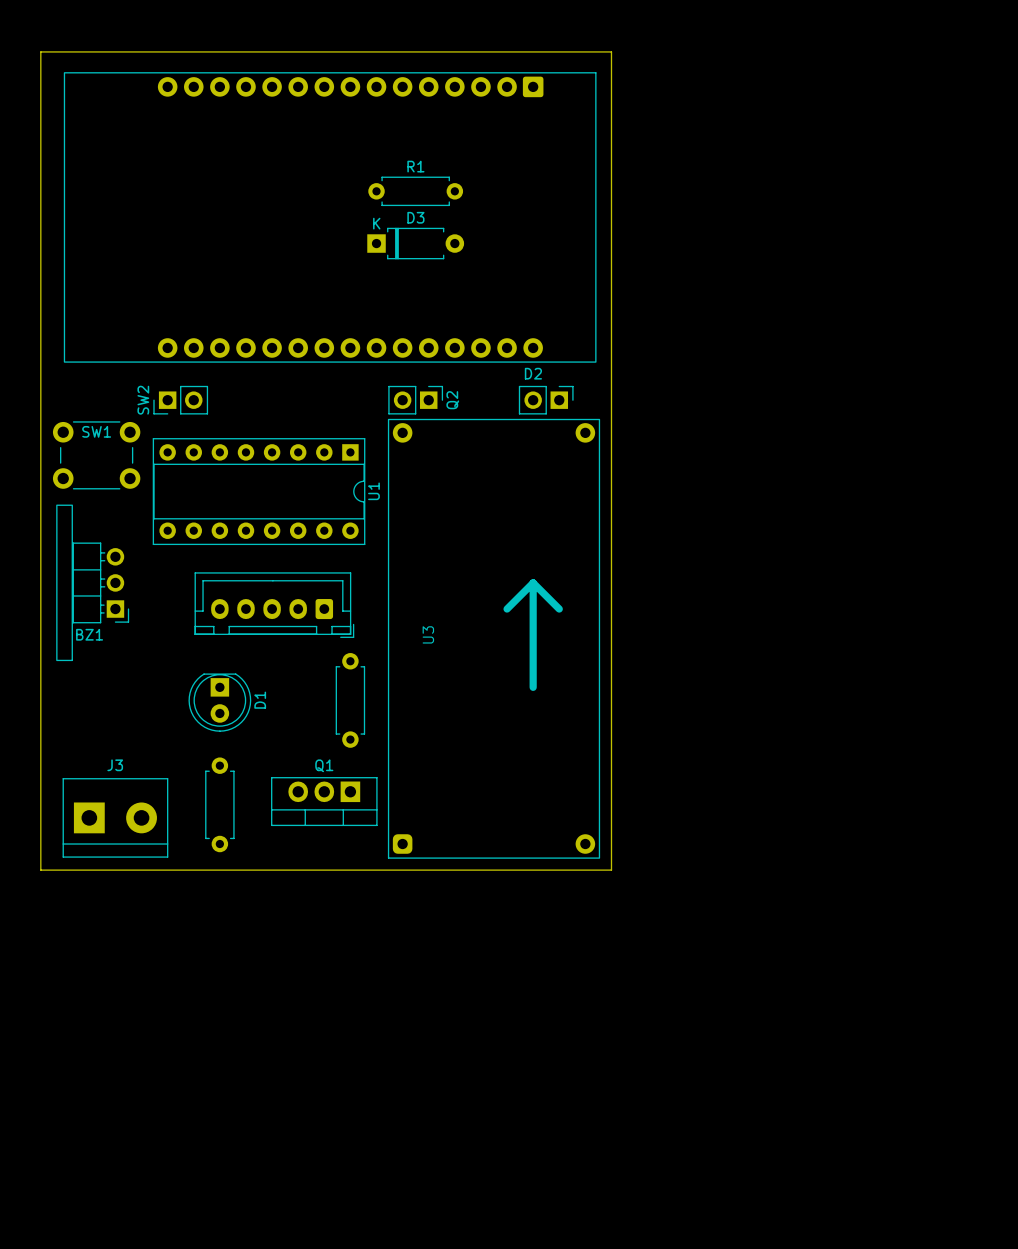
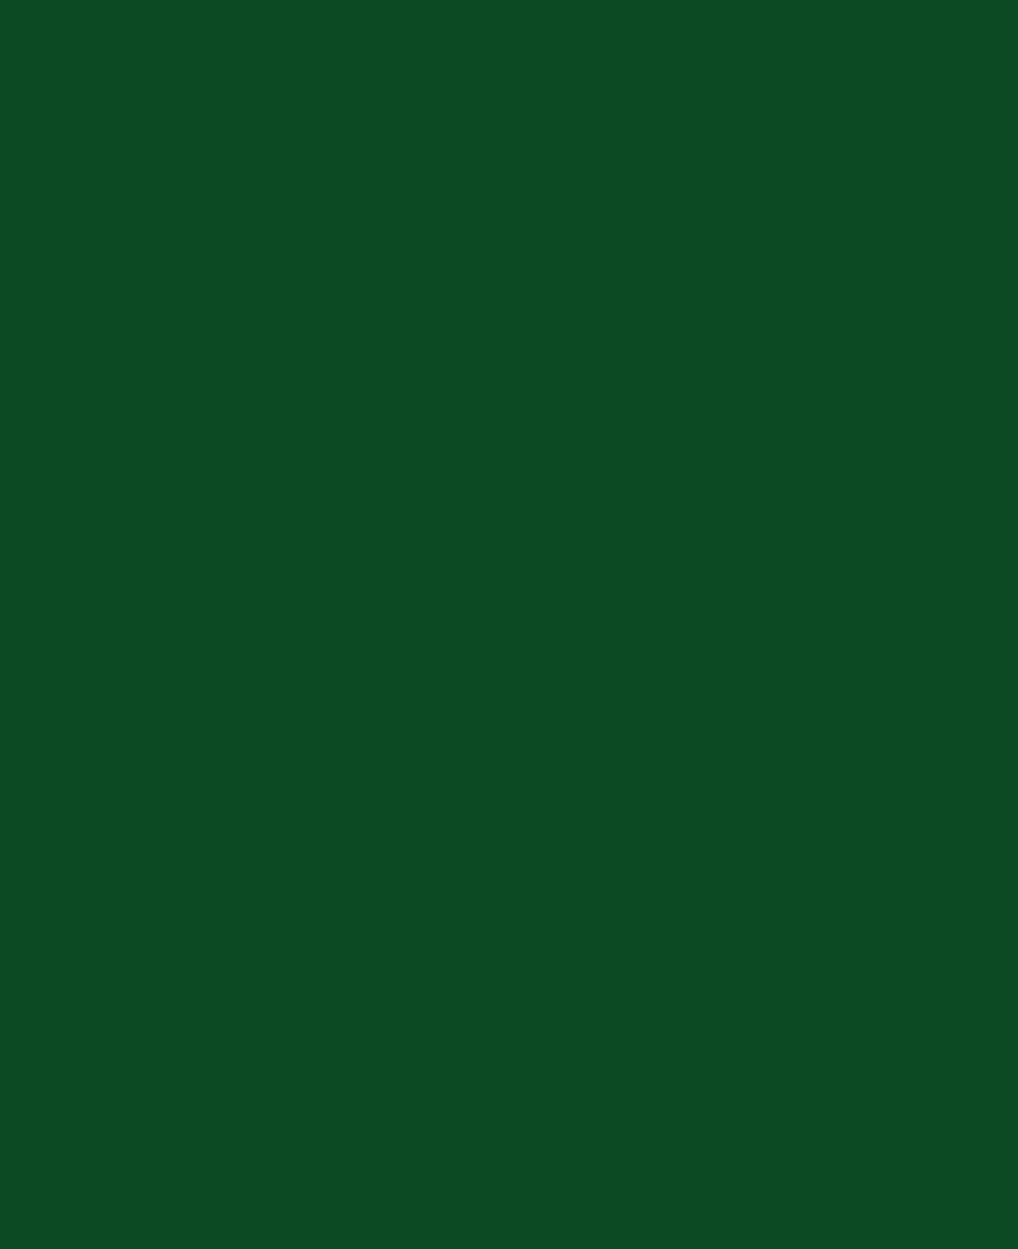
board edge: (40, 51) (611, 51) (611, 870) (40, 870) (40, 51) -> none
R1: (415, 191) -> none
part: (330, 217) -> none
D3: (415, 243) -> none
SW2: (180, 400) -> none
Q2: (415, 400) -> none
D2: (546, 400) -> none
SW1: (96, 455) -> none
U1: (259, 491) -> none
BZ1: (92, 582) -> none
part: (274, 605) -> none
U3: (494, 638) -> none
part: (350, 700) -> none
D1: (219, 702) -> none
Q1: (324, 801) -> none
part: (219, 804) -> none
J3: (115, 817) -> none

